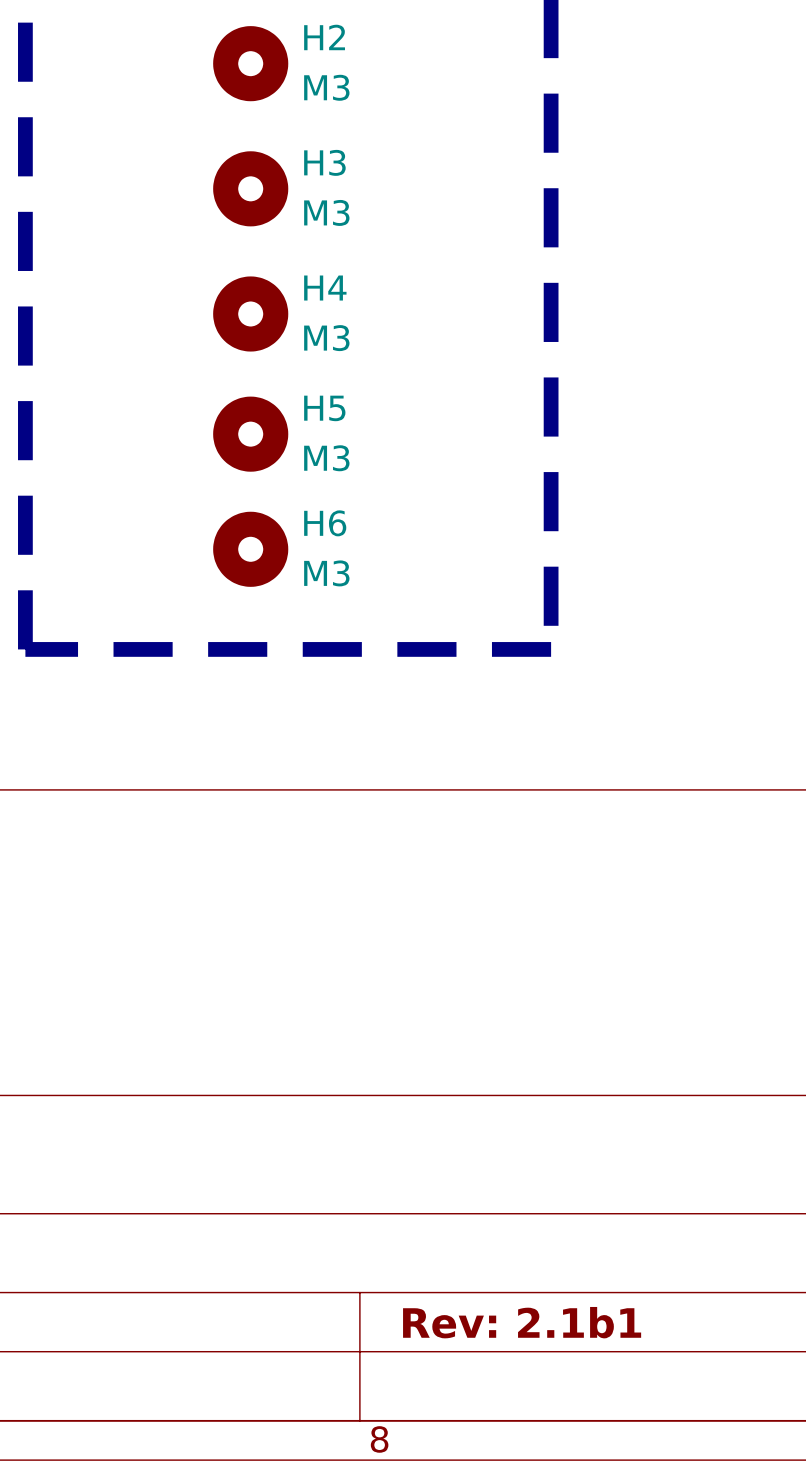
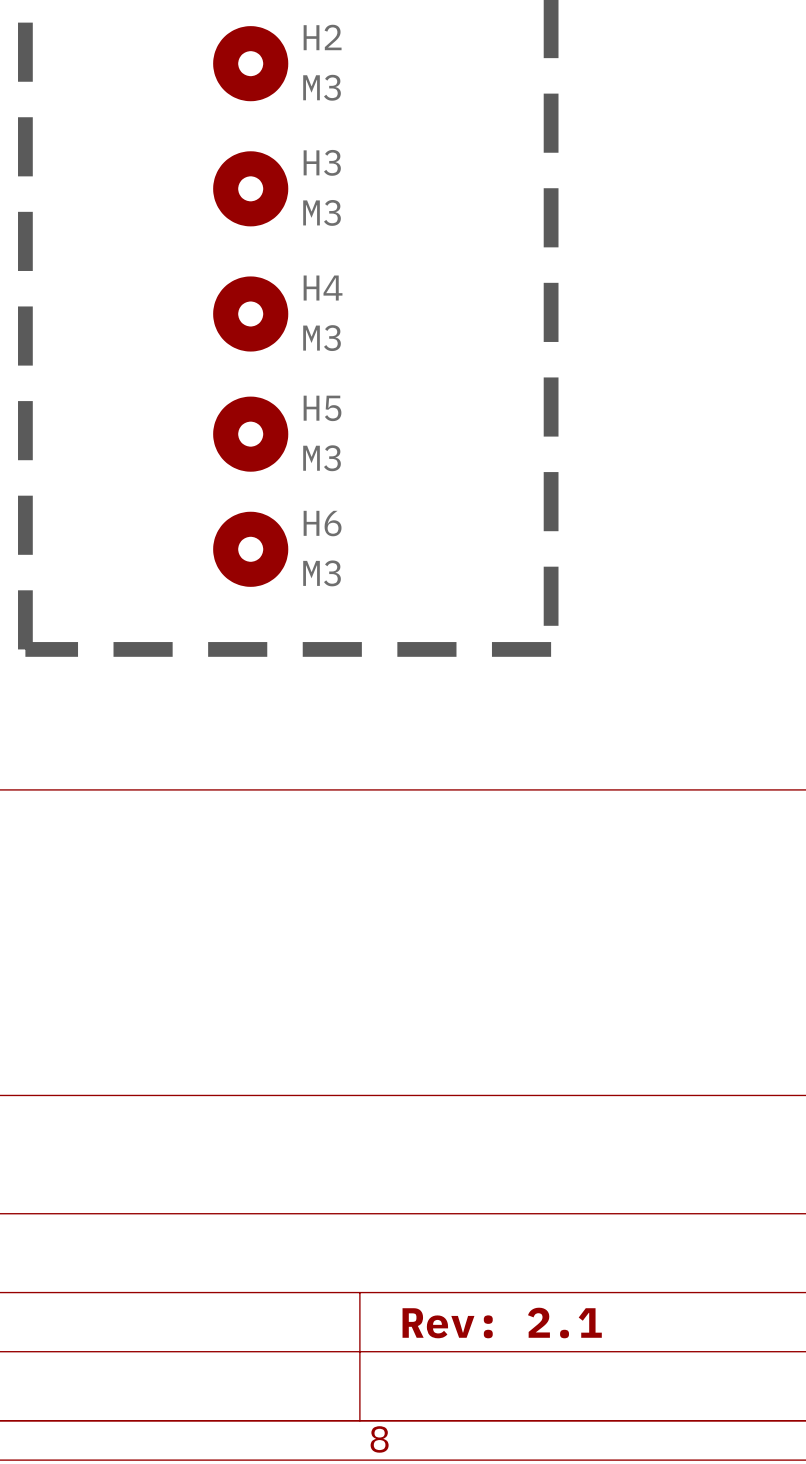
title block: Rev: 2.1b1 (522, 1322) -> Rev: 2.1 (502, 1323)

